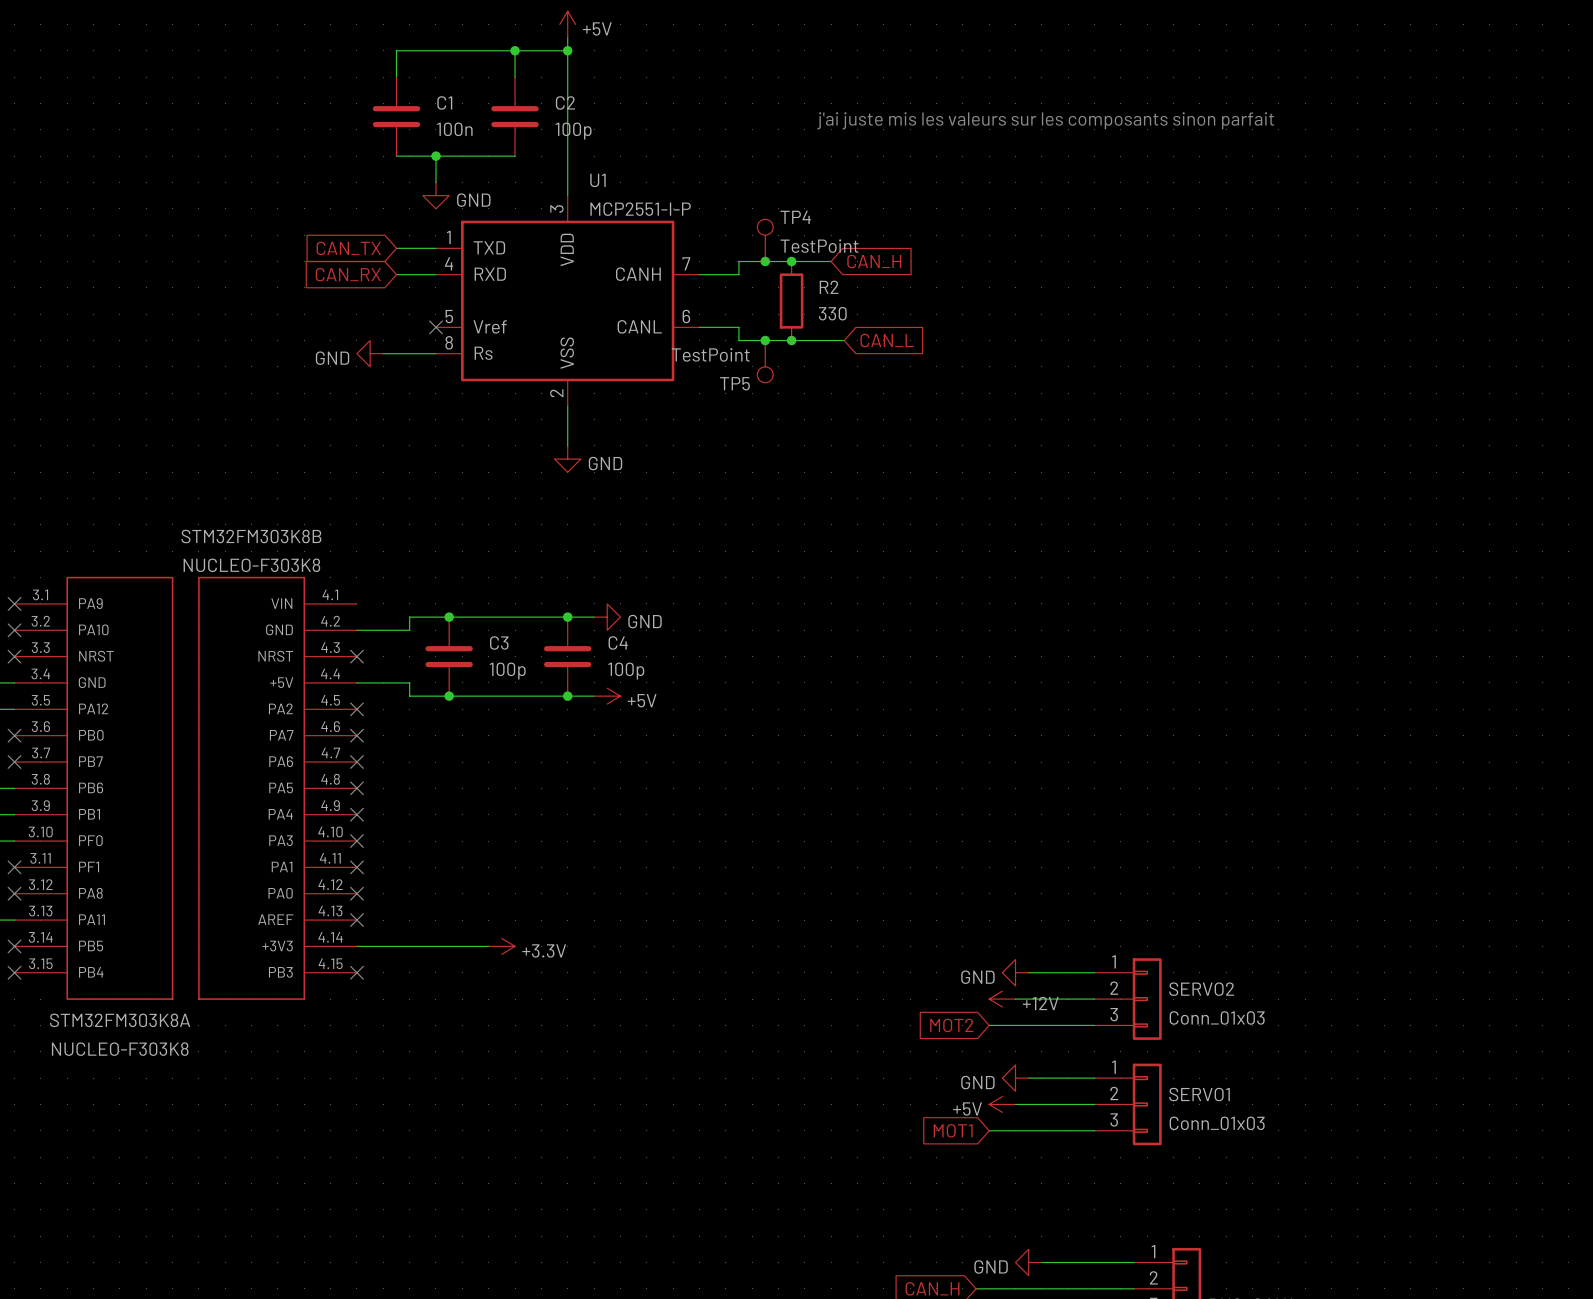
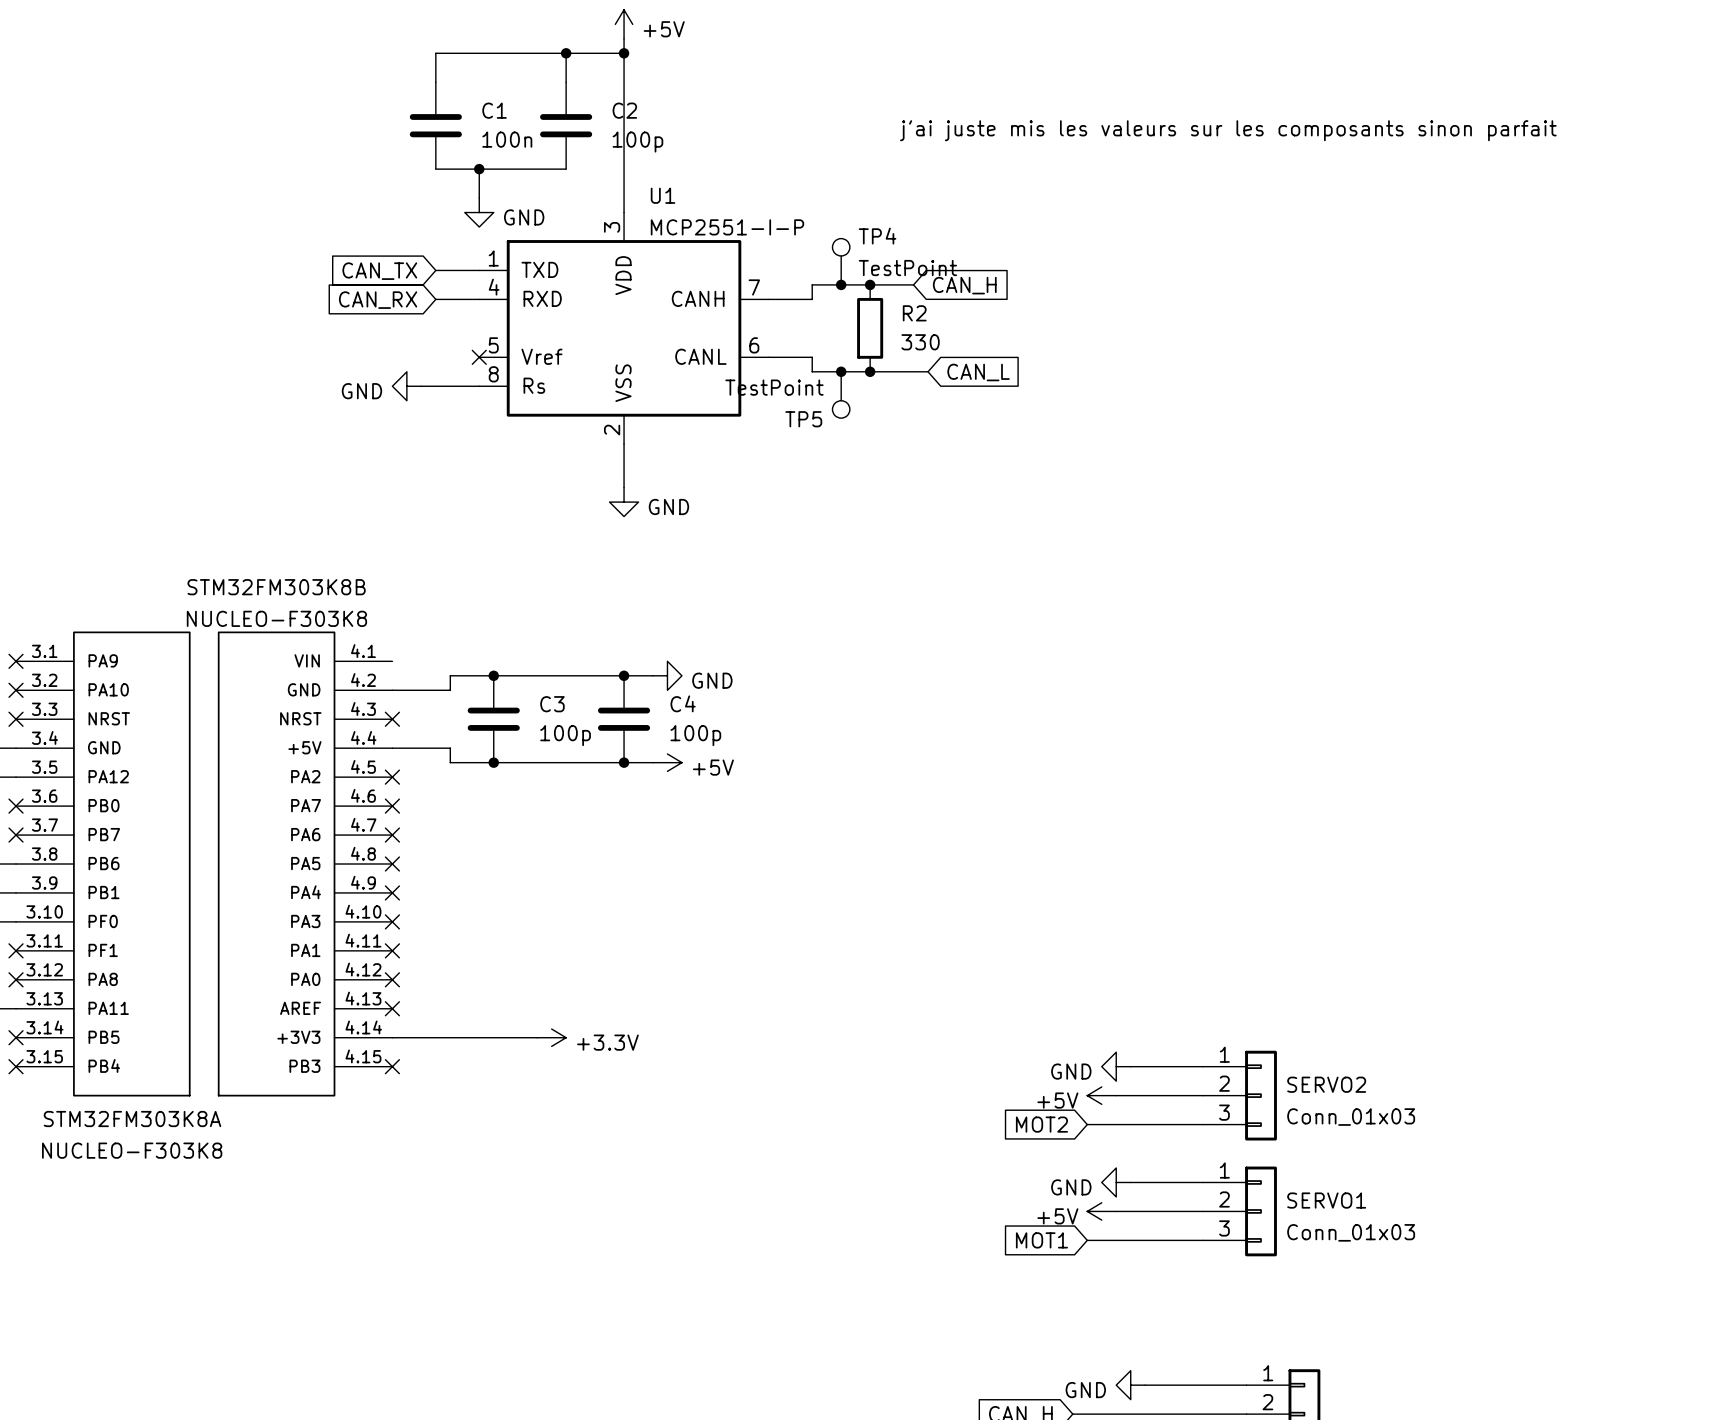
power symbol: +12V (1002, 999) -> +5V (1101, 1095)

